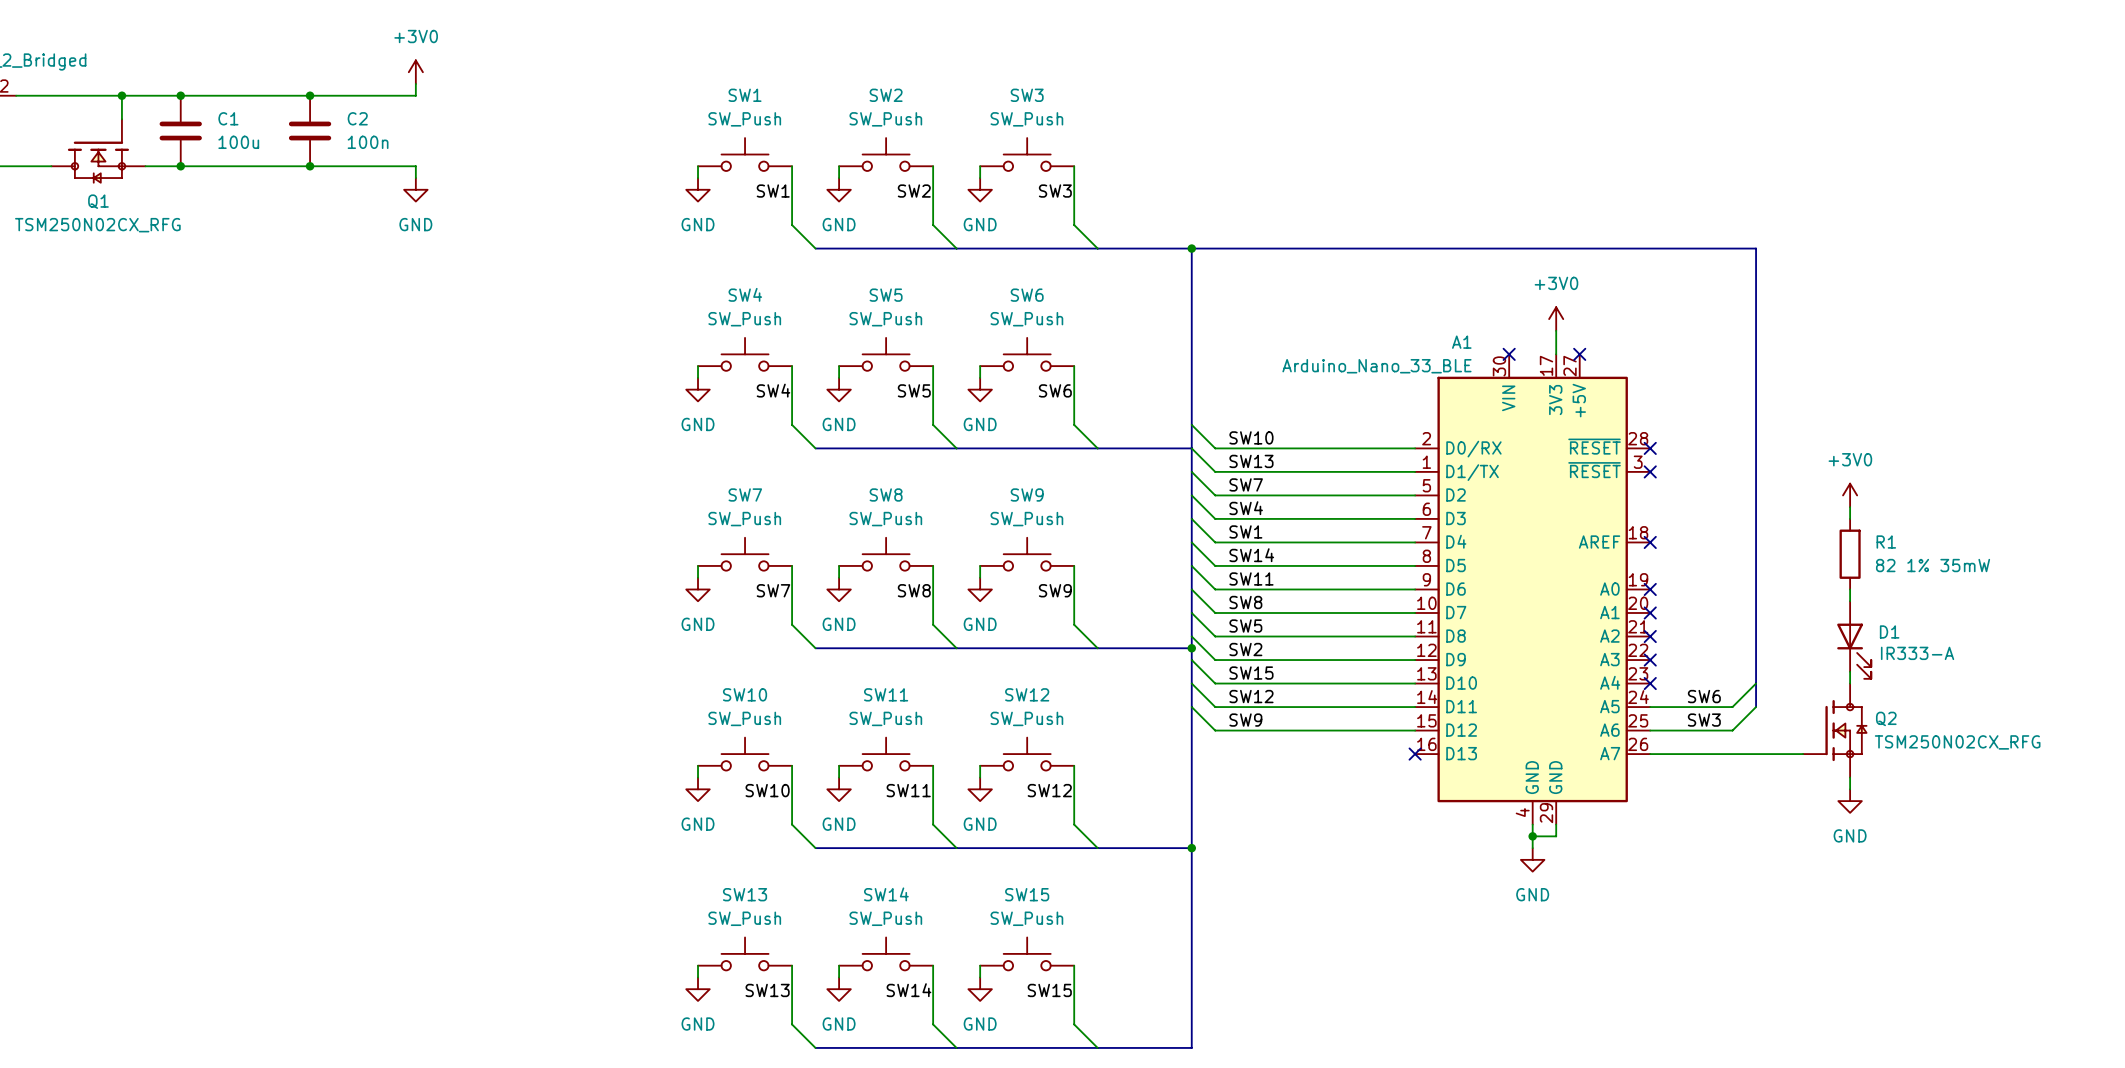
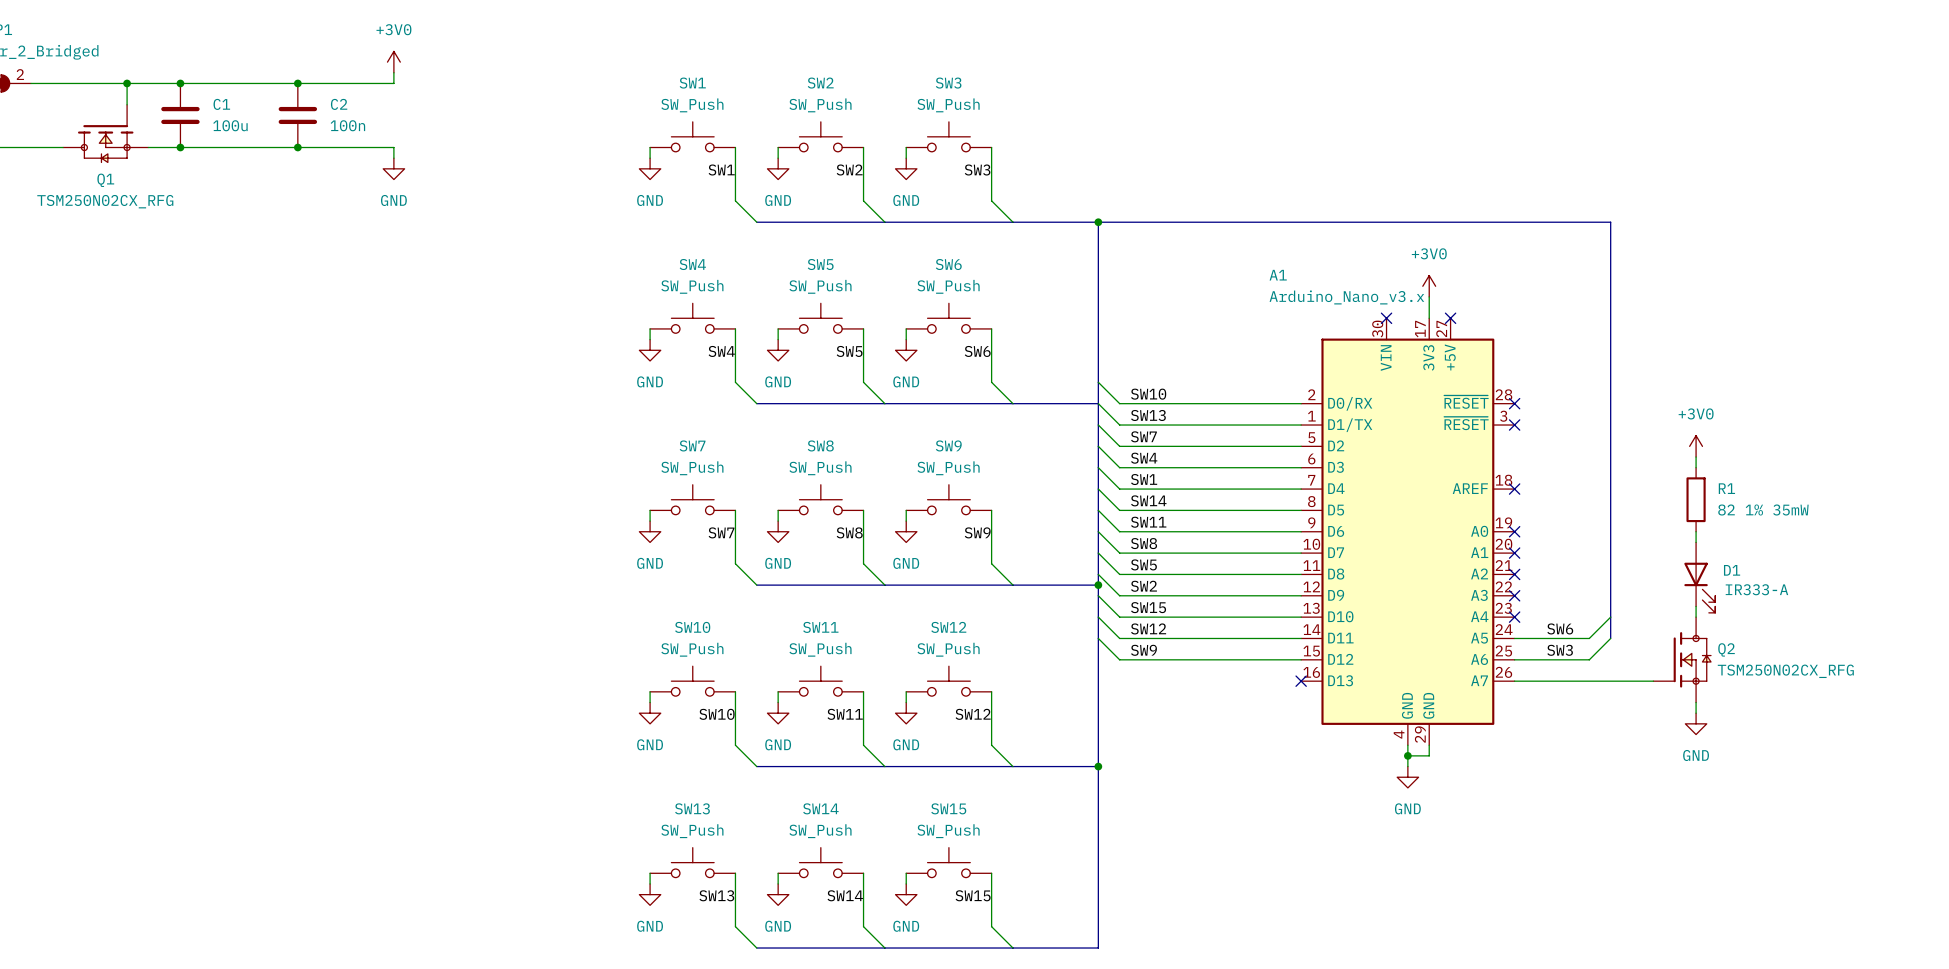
A1 name position: A1 (1461, 342) -> A1 (1278, 275)
A1 value: Arduino_Nano_33_BLE (1376, 366) -> Arduino_Nano_v3.x (1346, 297)

